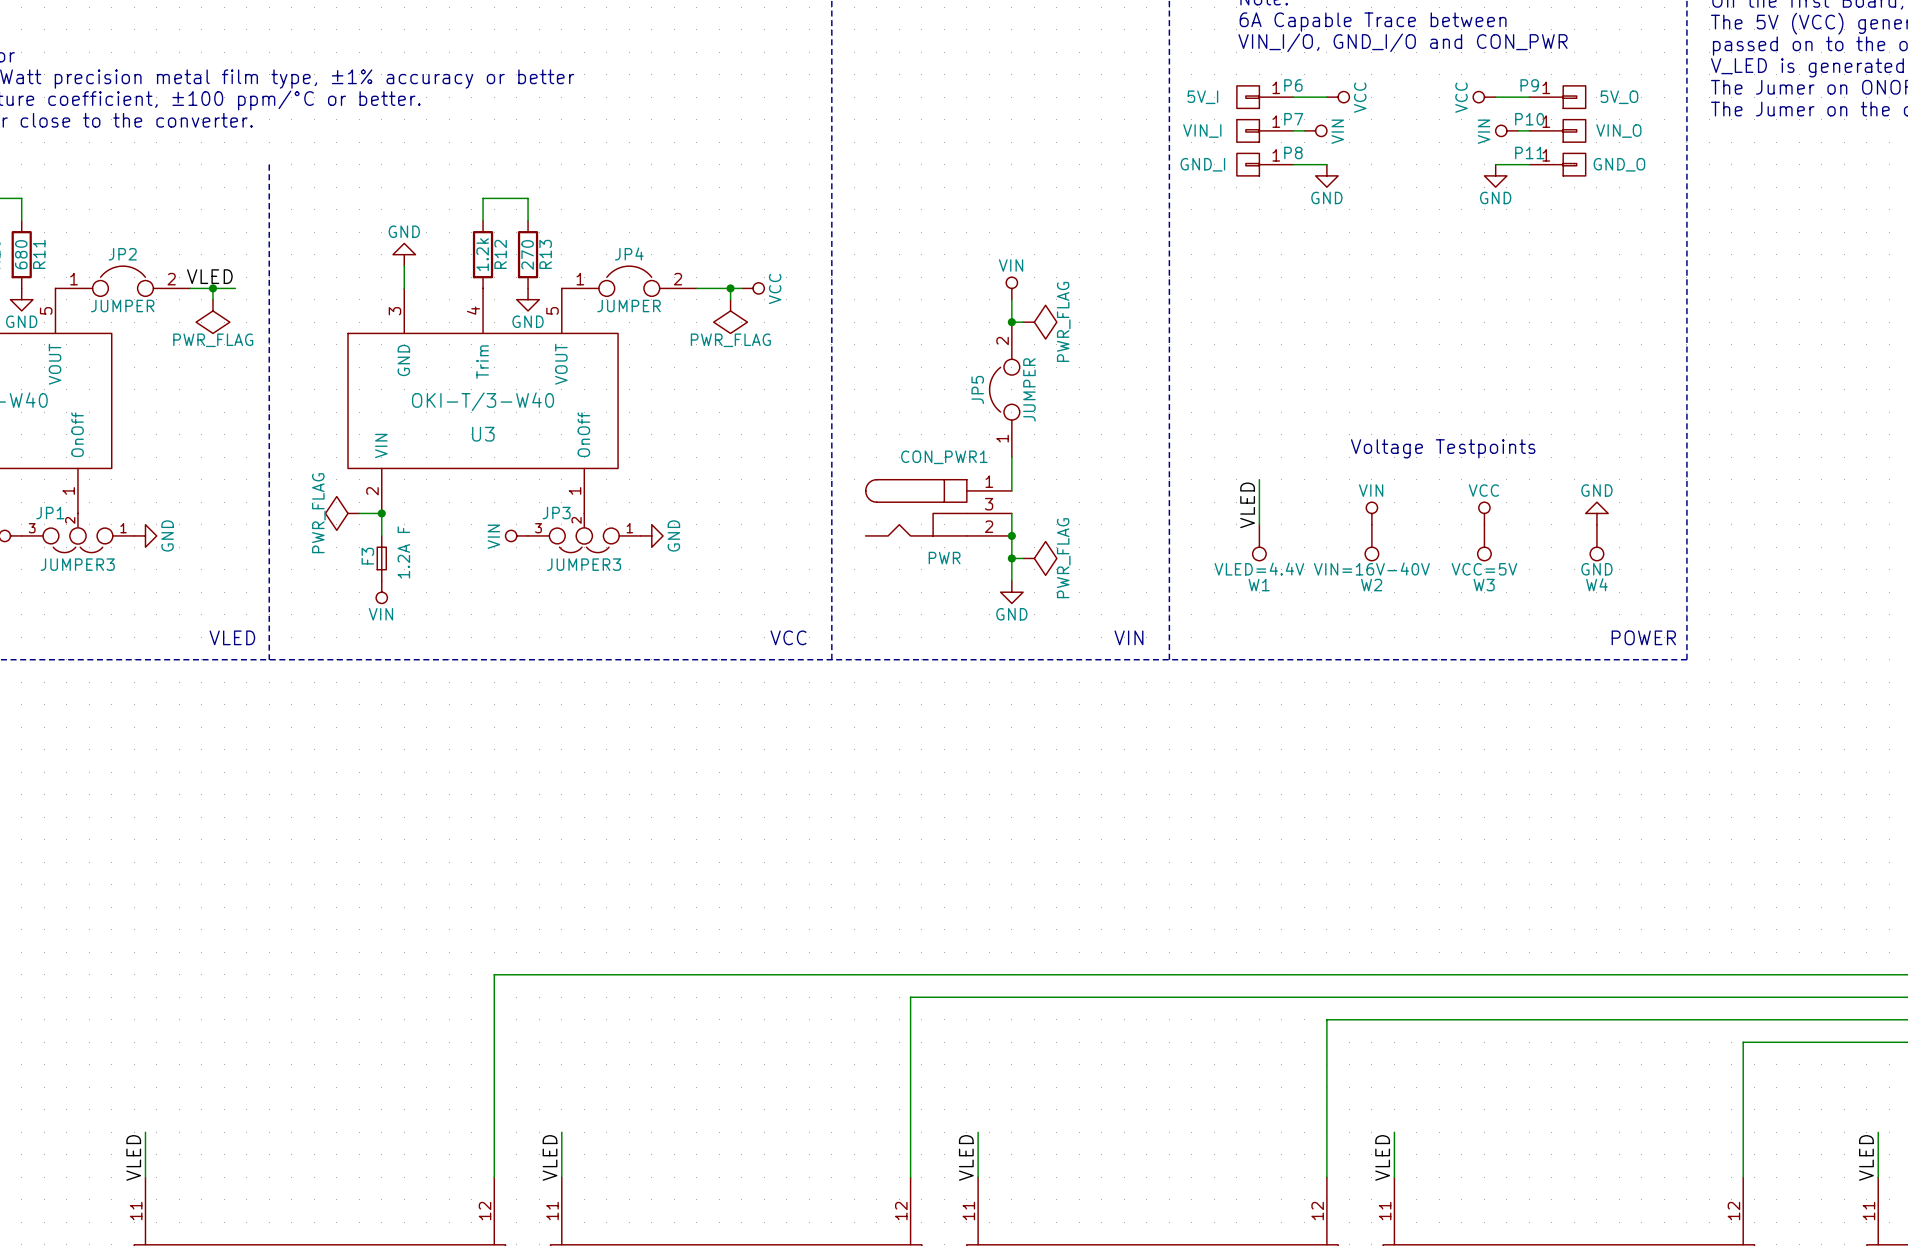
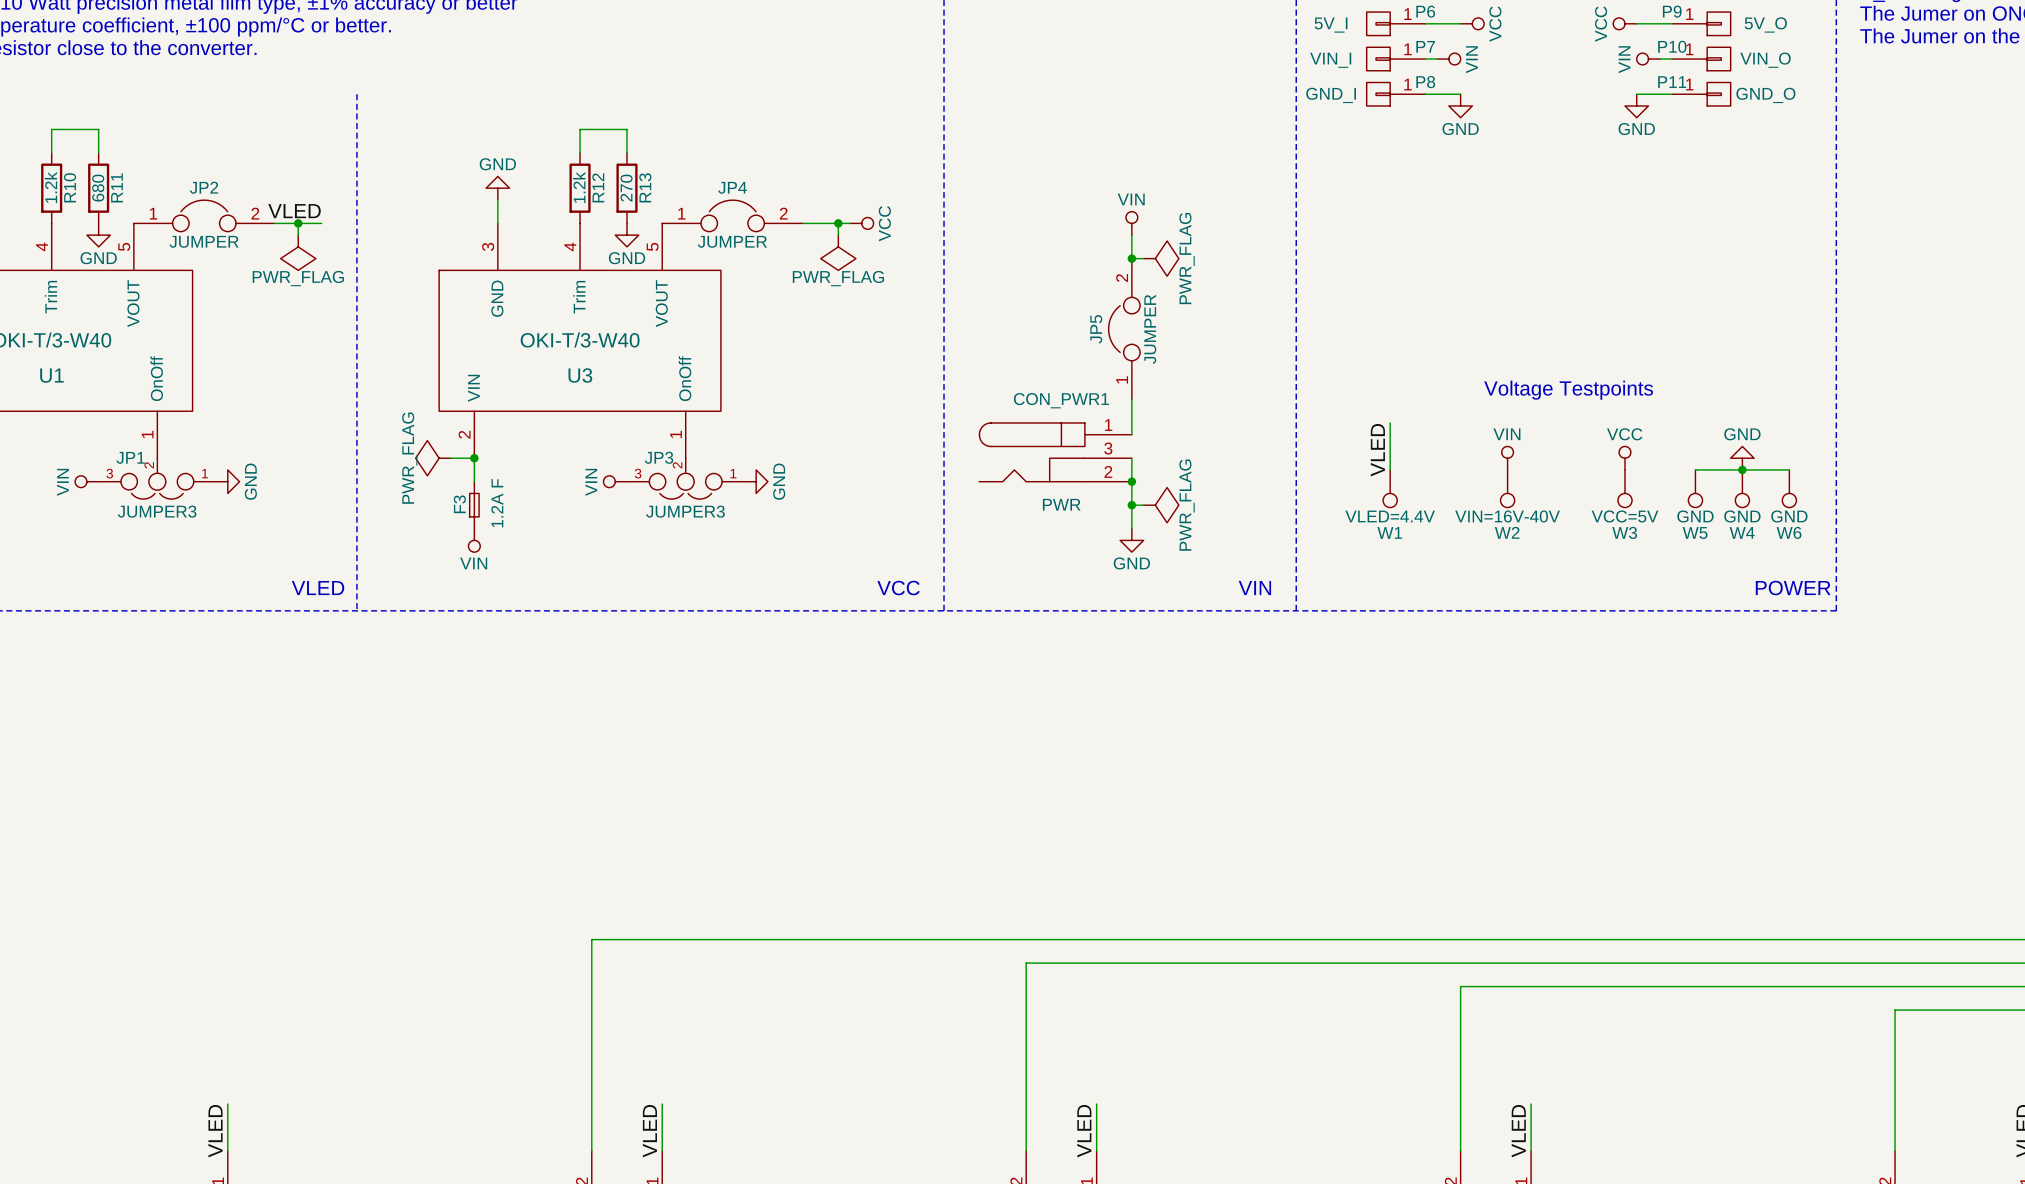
wire: none -> (1695, 469) (1789, 469)
junction: none -> (1742, 469)
W5: none -> GND (1695, 488)
W6: none -> GND (1789, 488)

